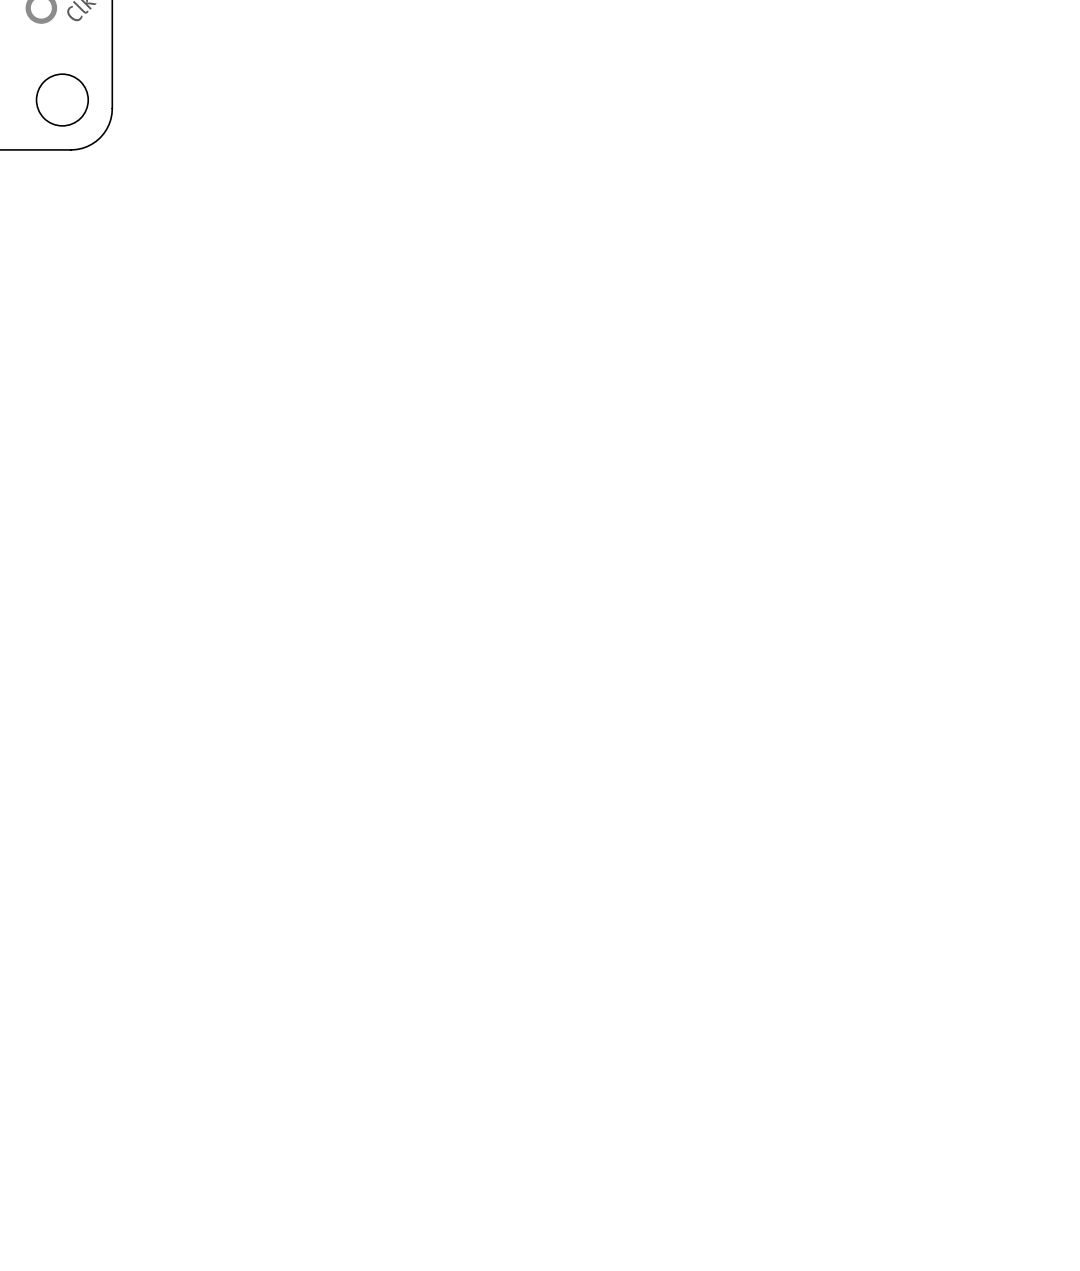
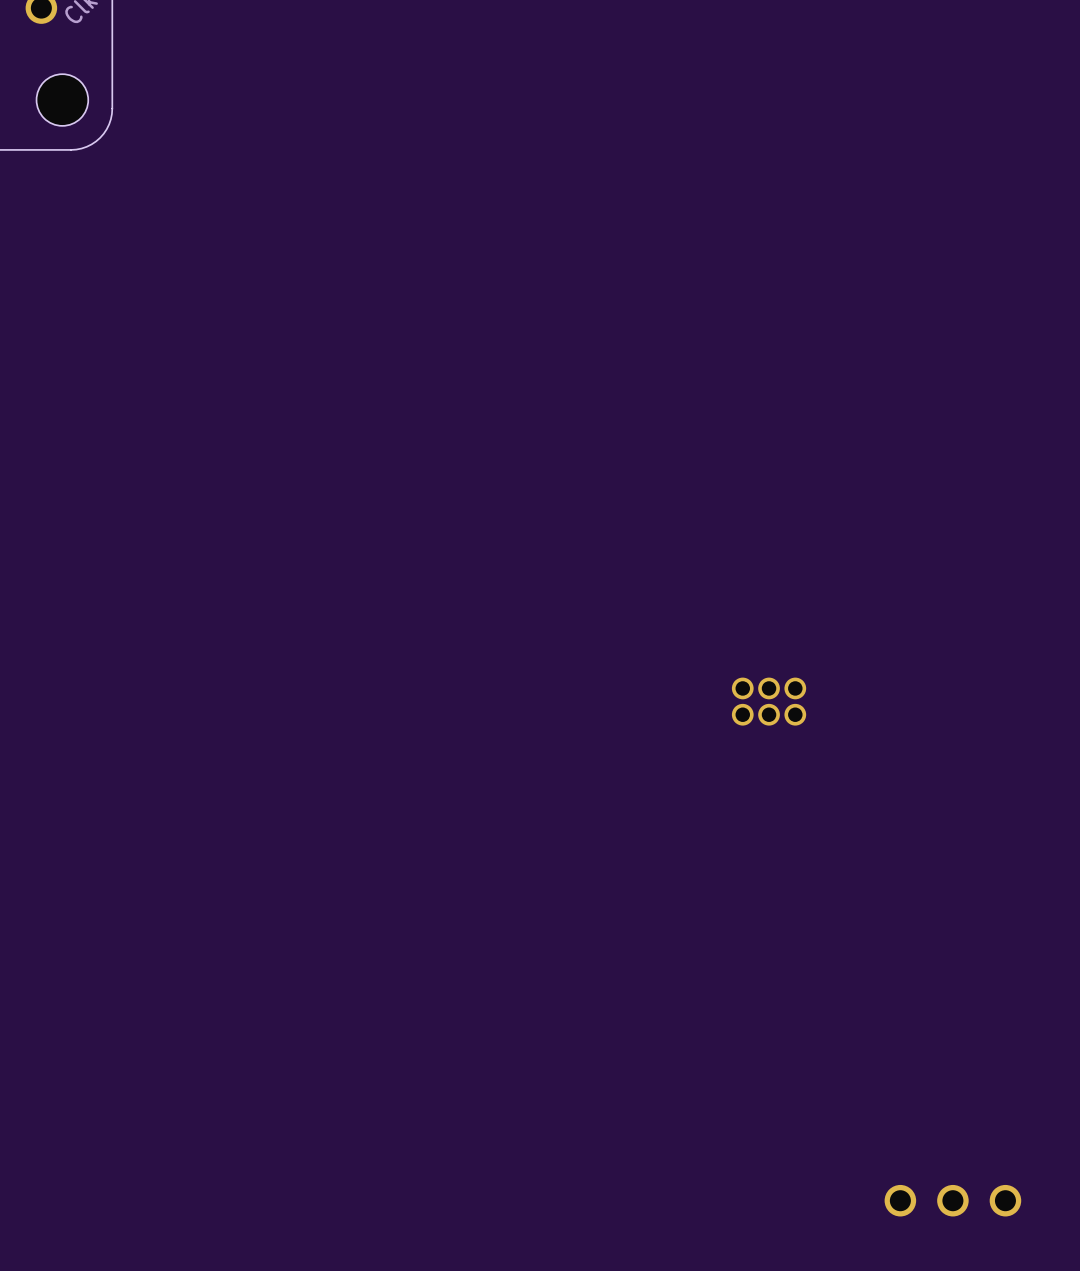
part: none -> (769, 701)
part: none -> (952, 1200)

